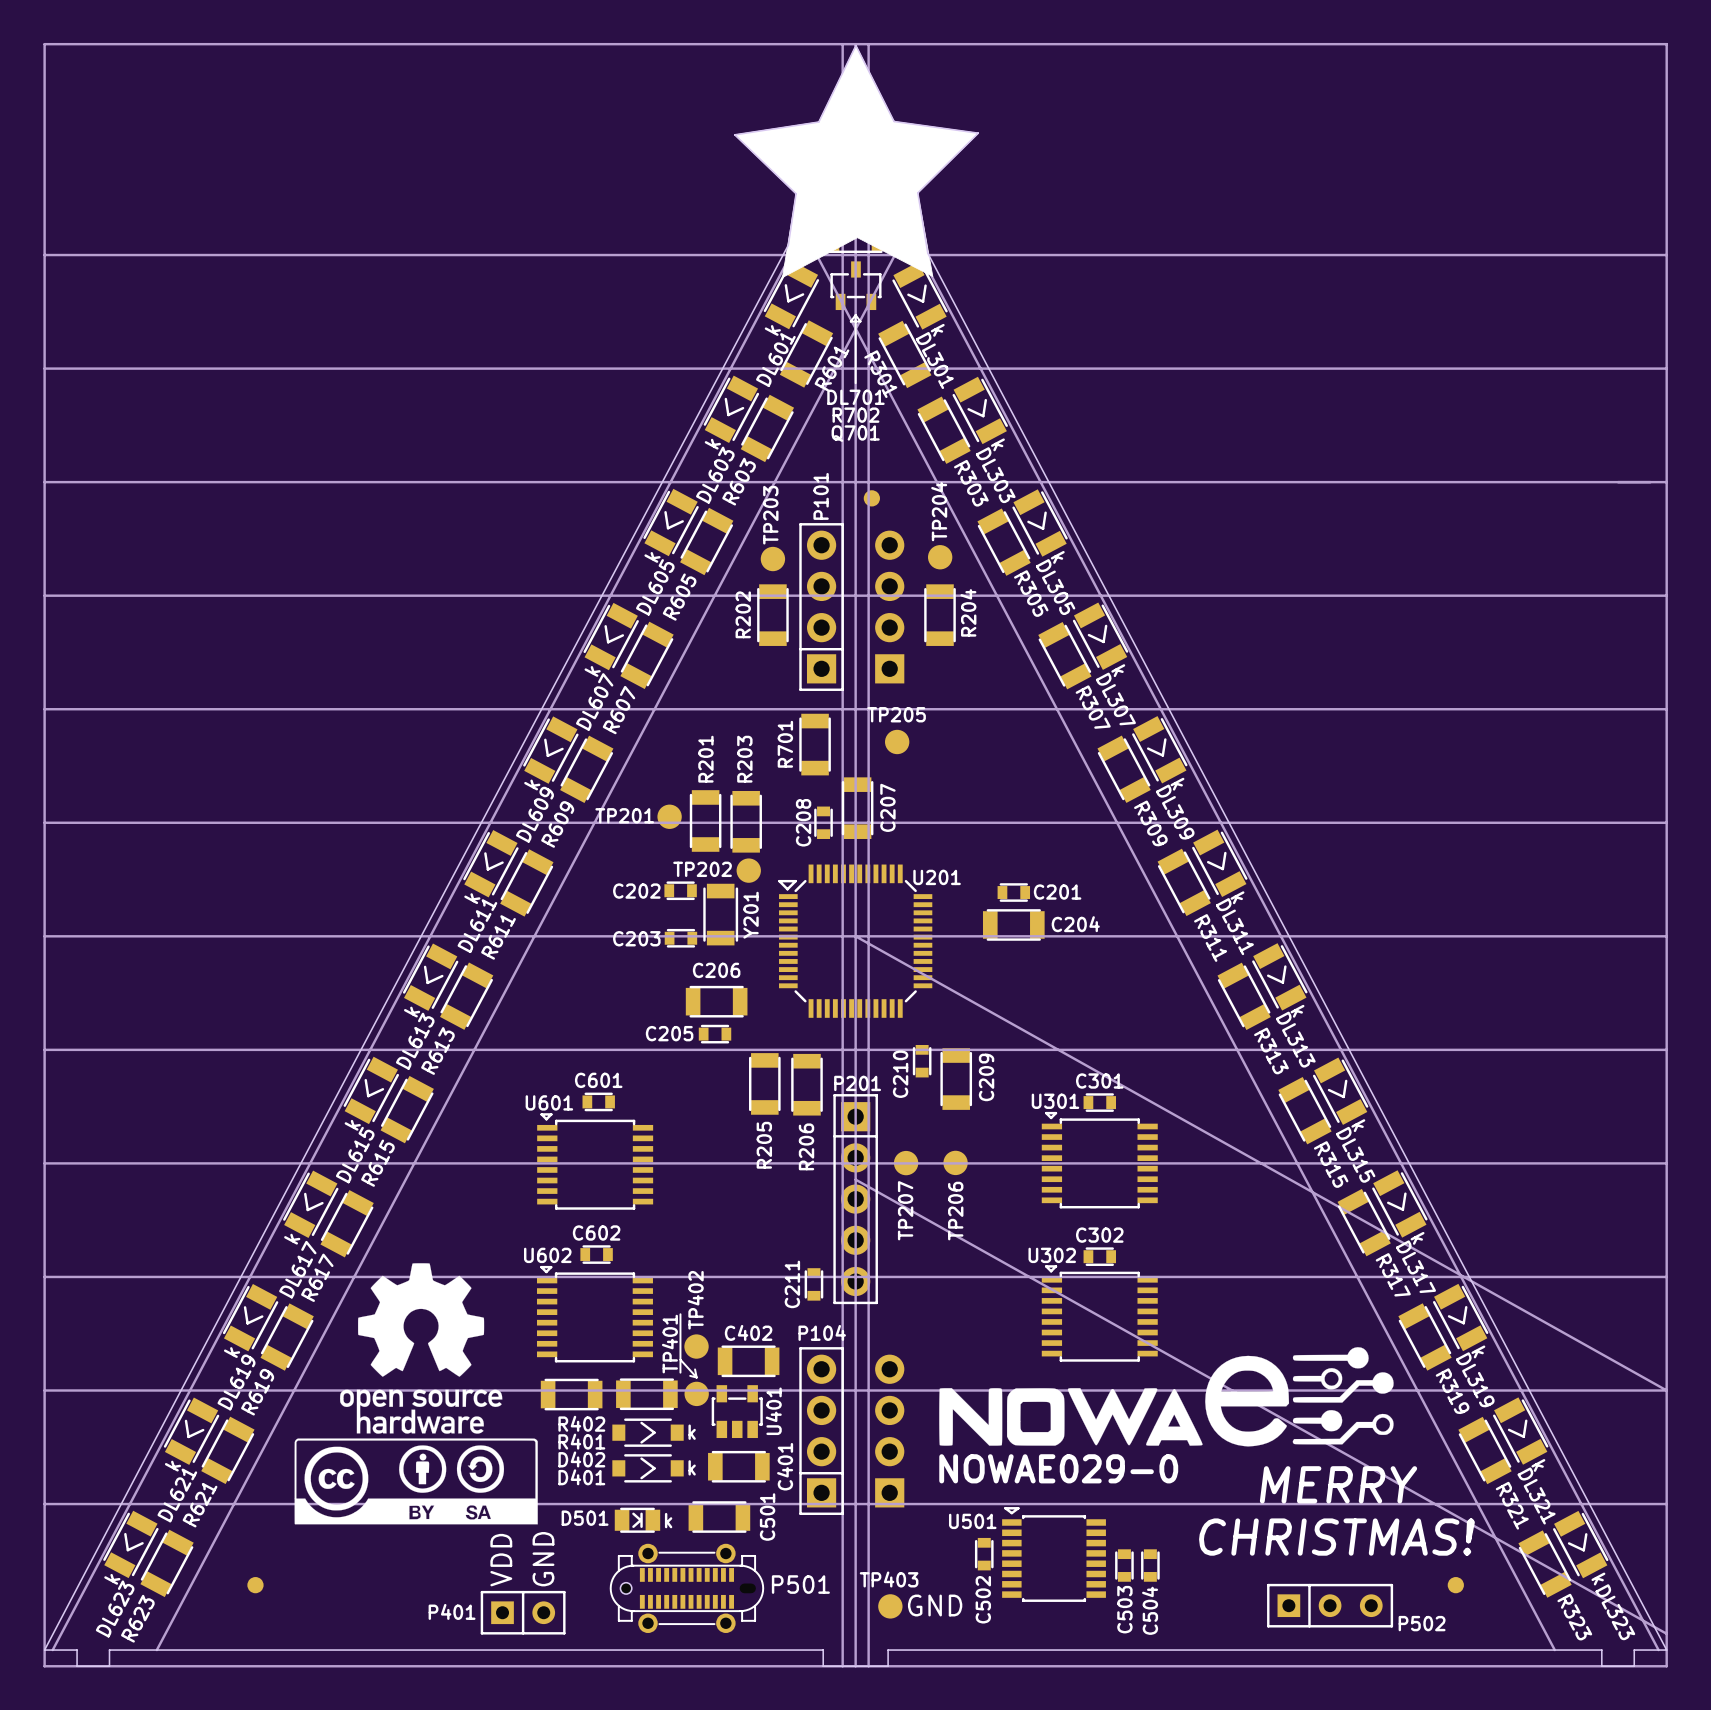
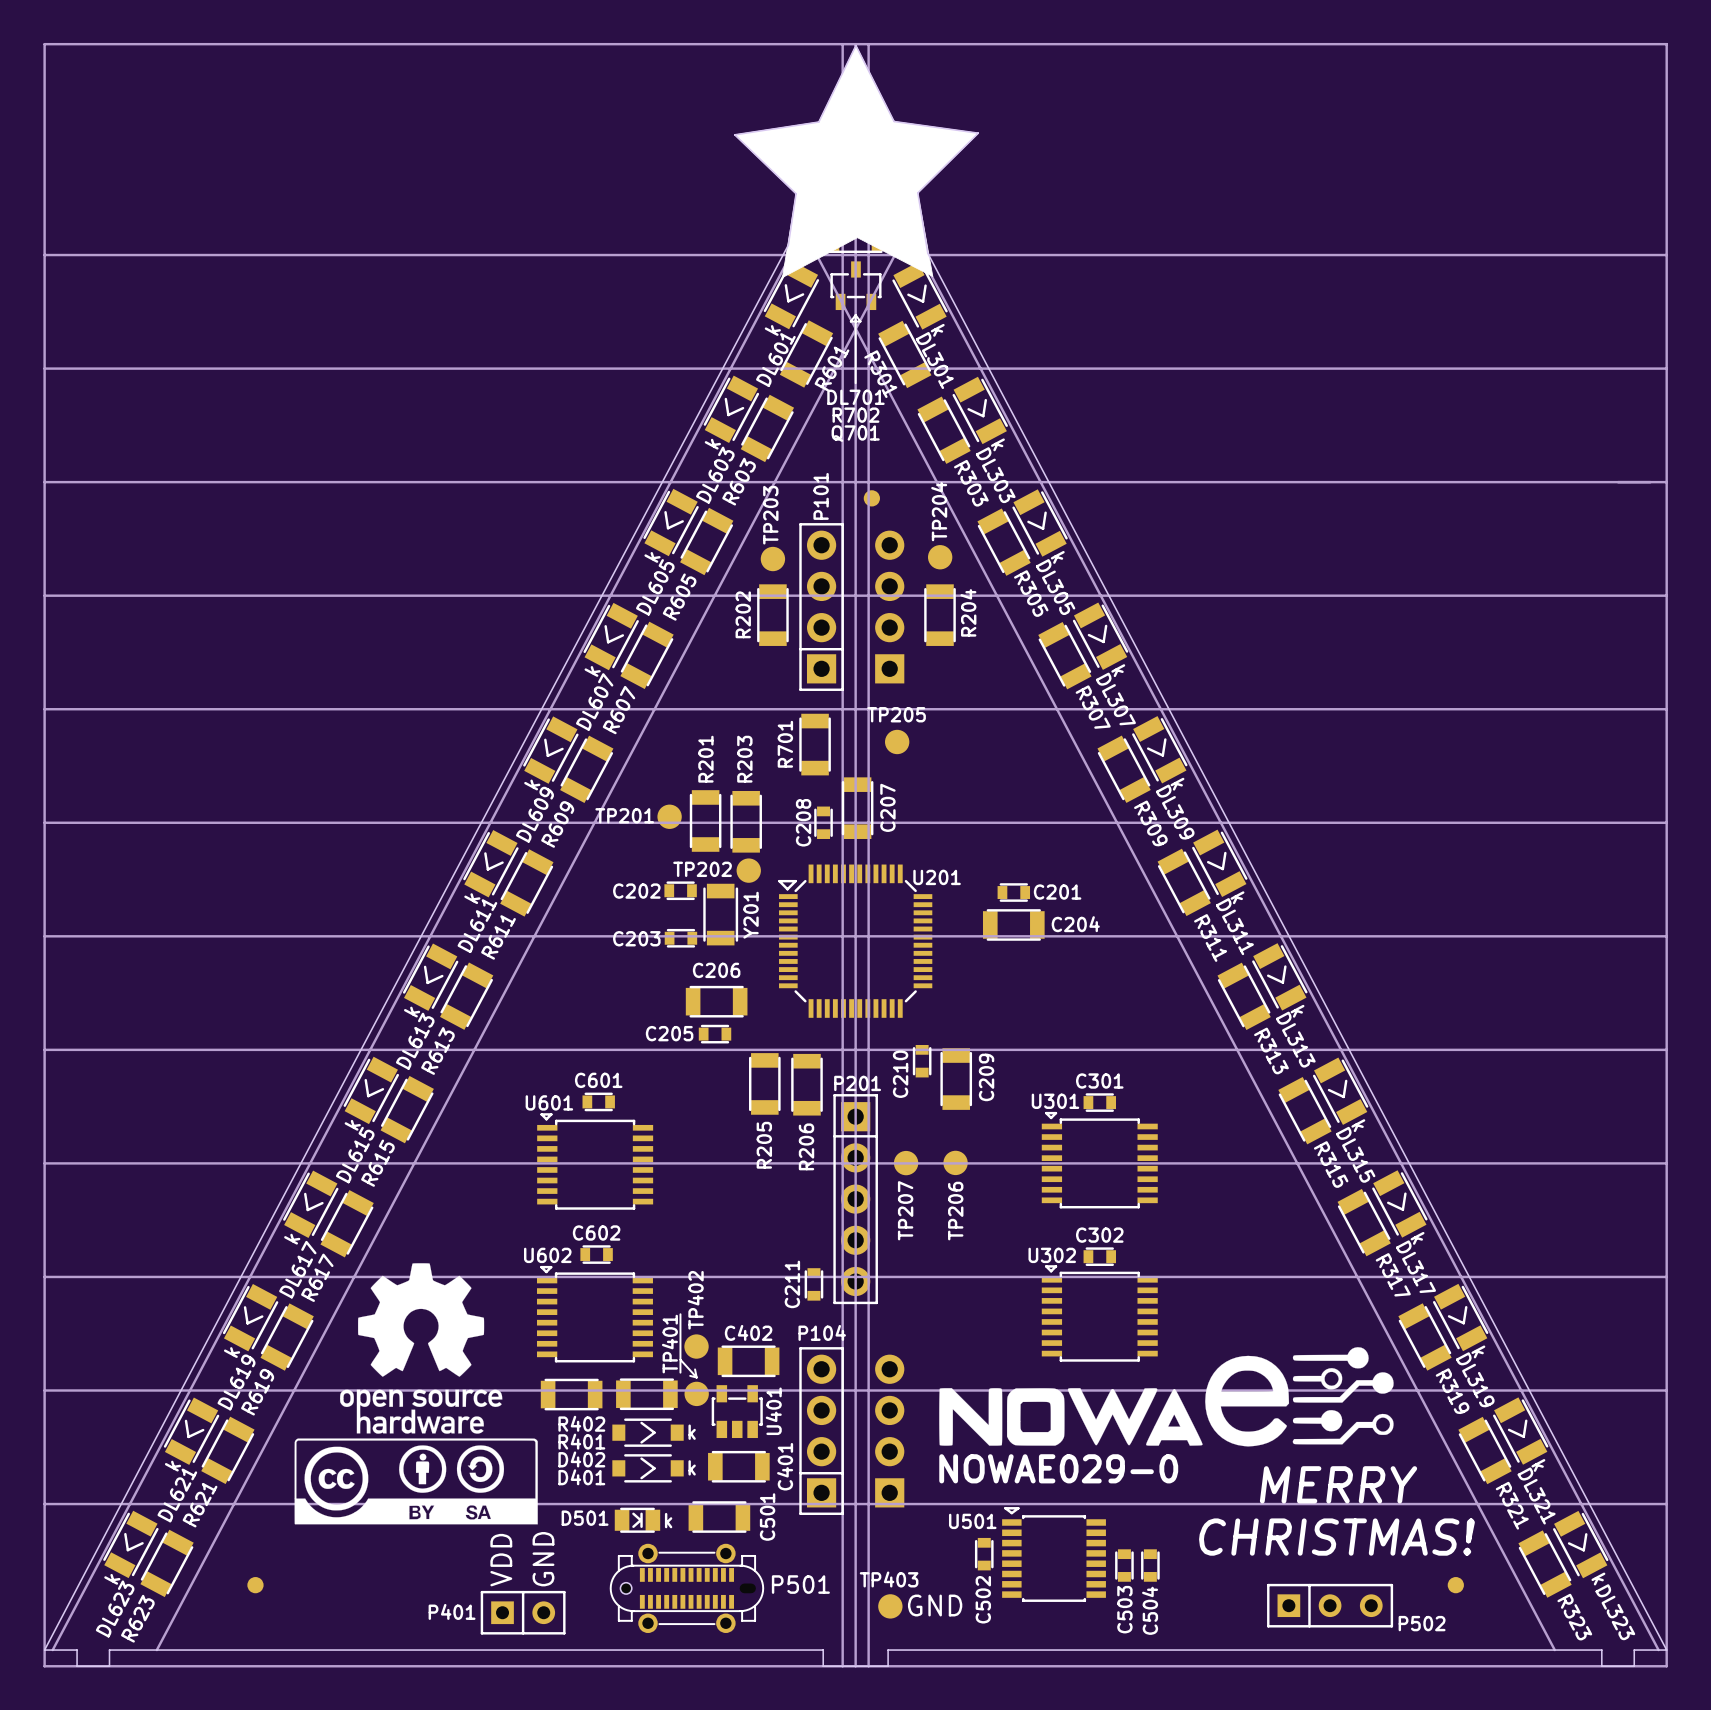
line: (855, 936) (1666, 1390) -> none
line: (855, 1179) (1666, 1633) -> none

